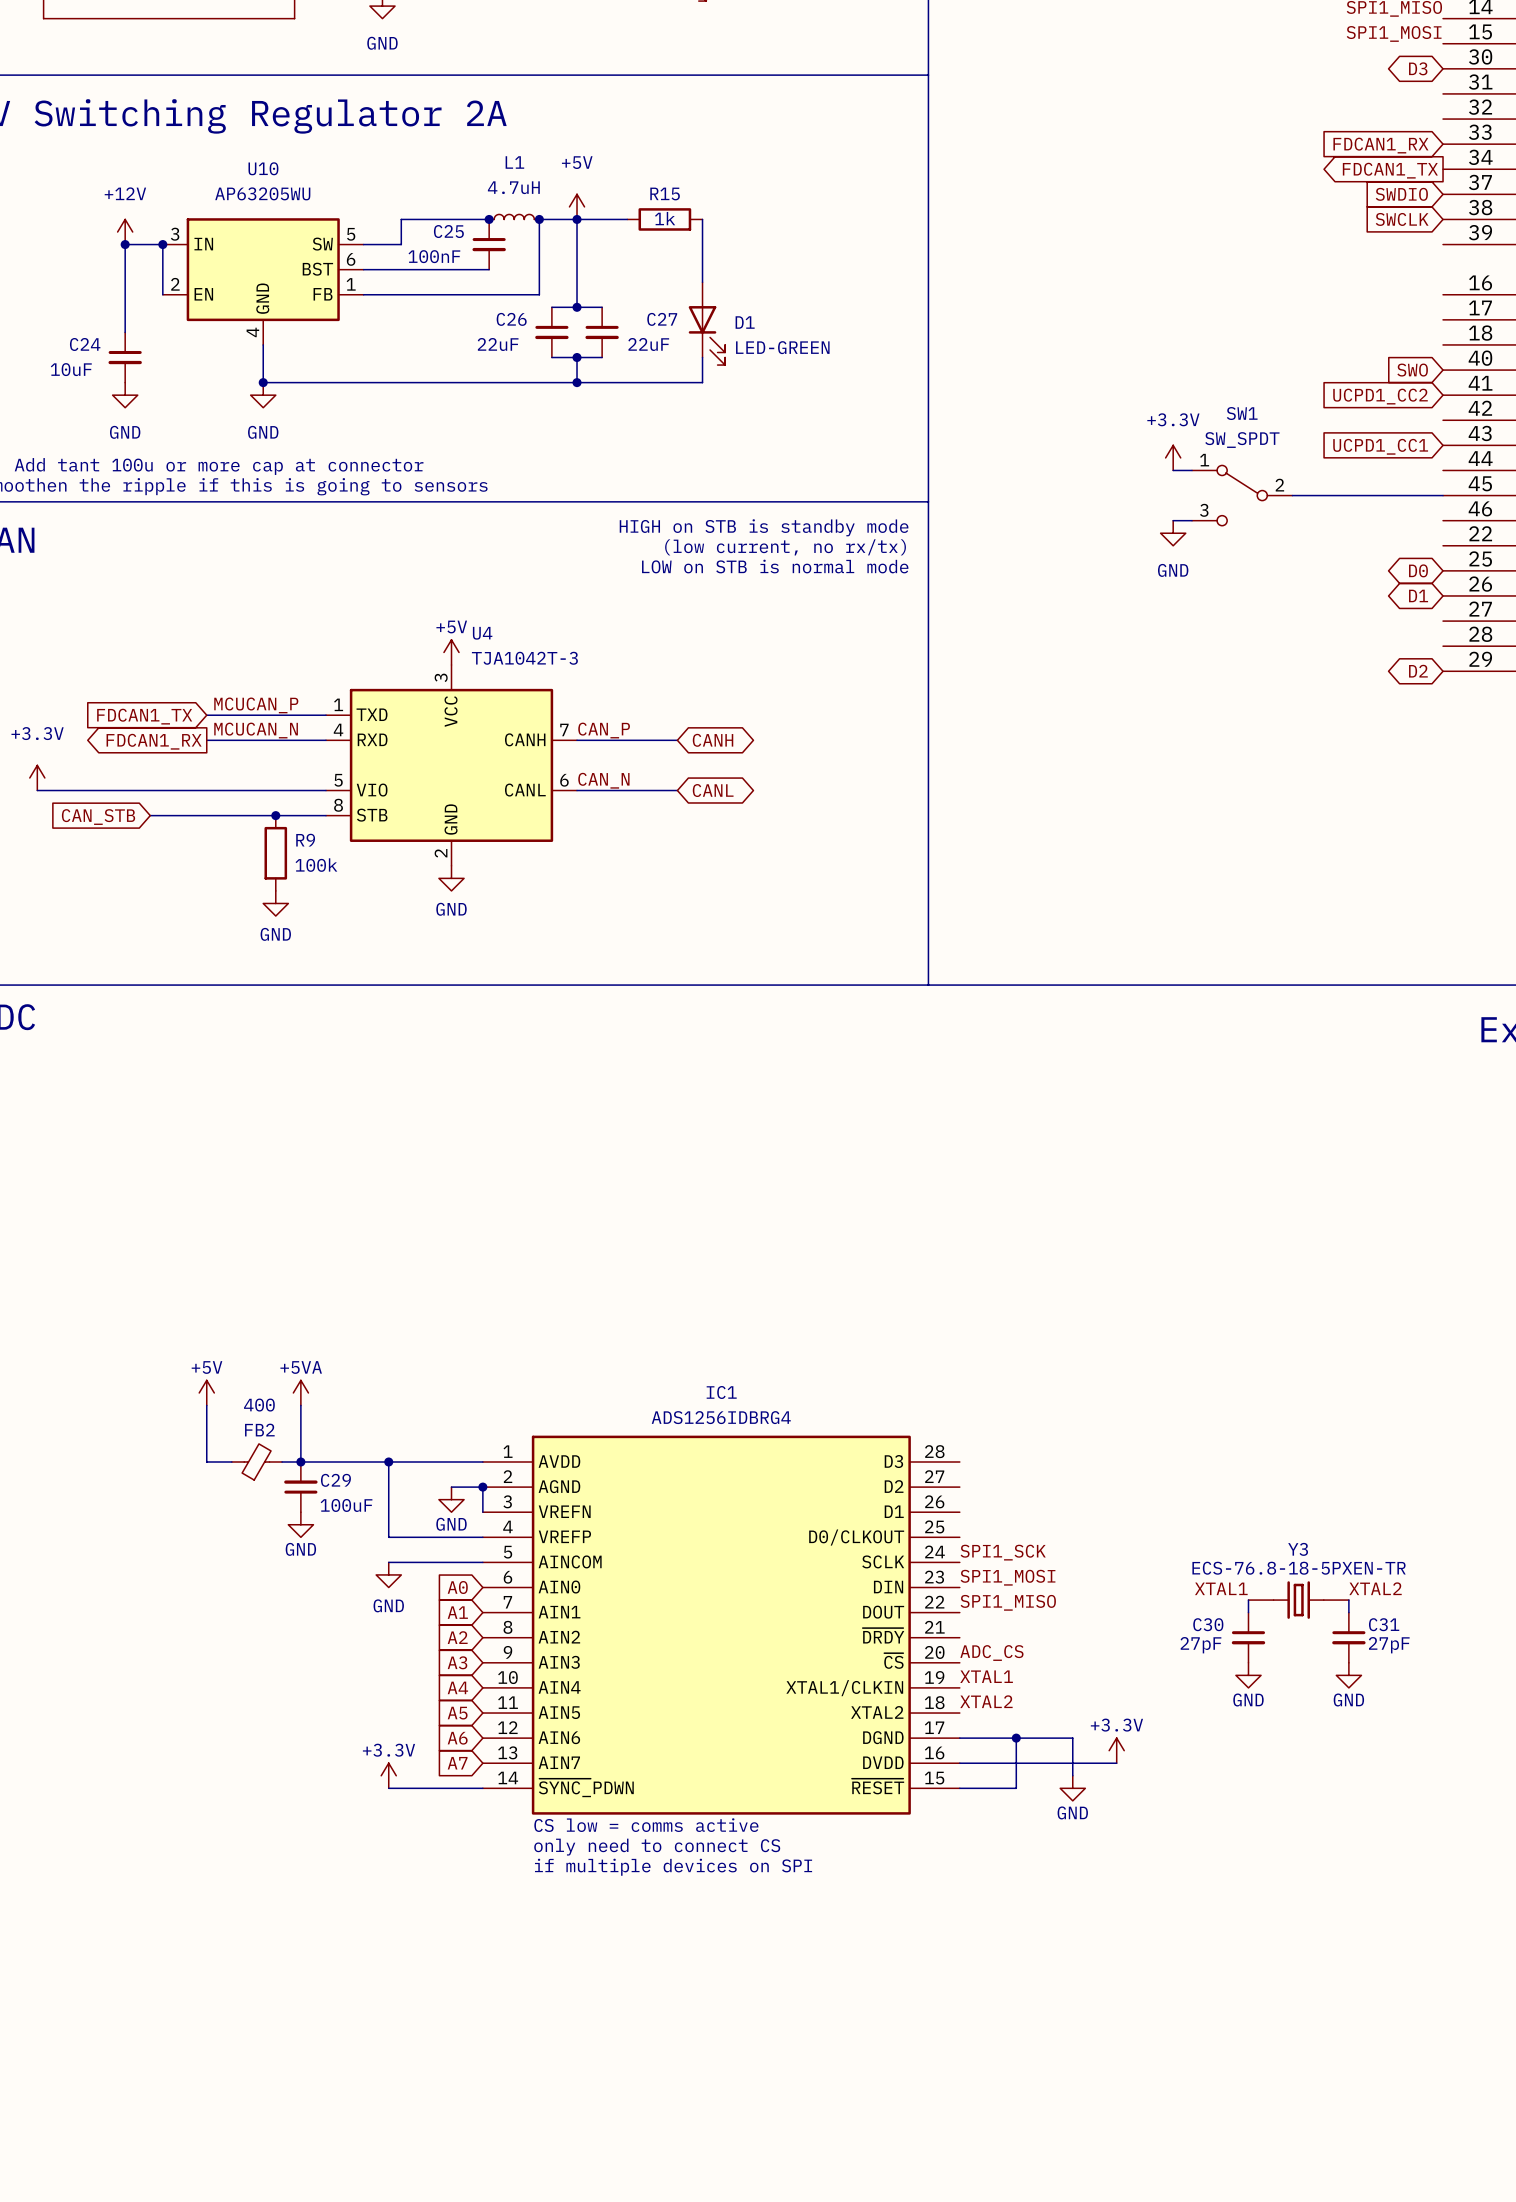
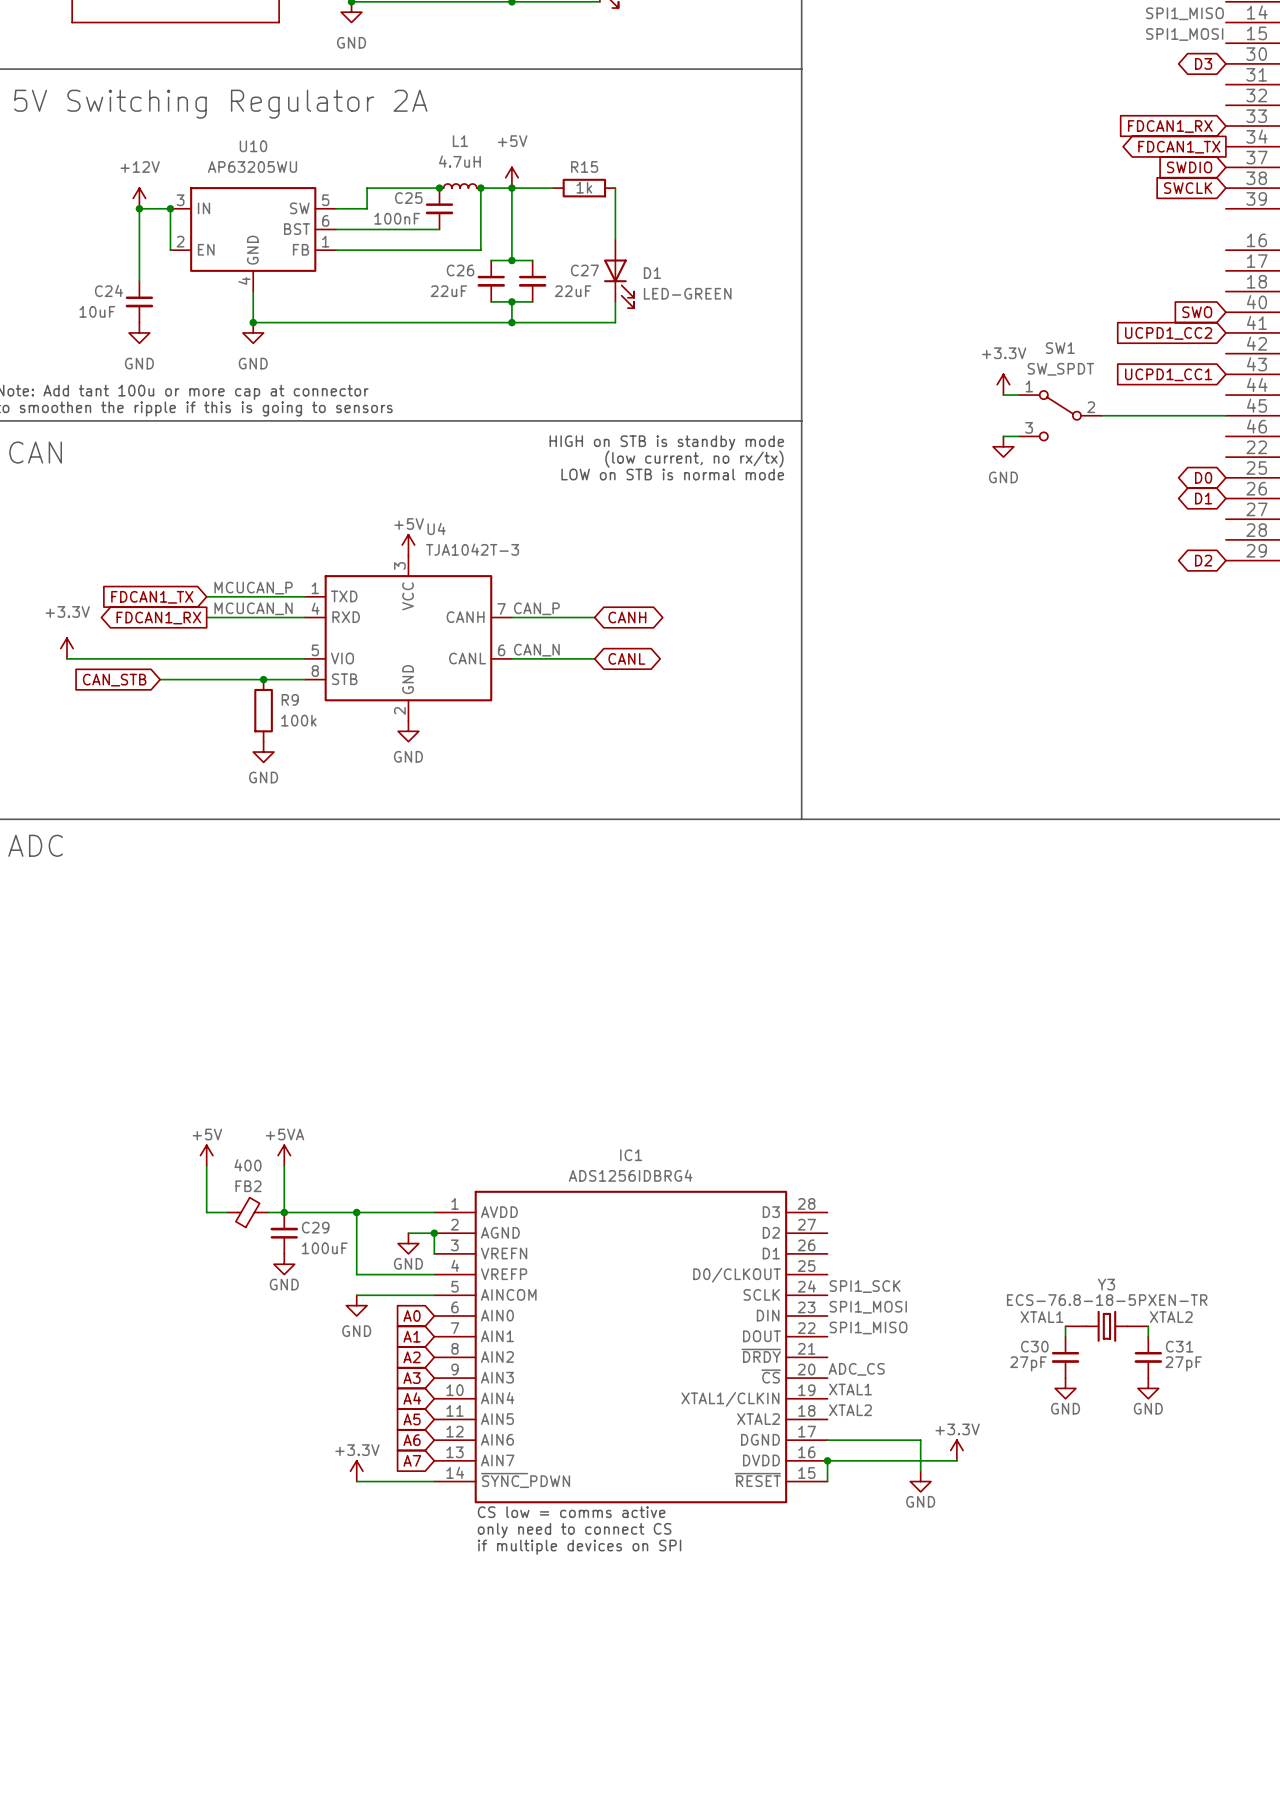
wire: (1016, 1738) (1016, 1788) (959, 1788) -> (827, 1460) (827, 1481)
junction: (1016, 1738) -> none
junction: none -> (827, 1460)

